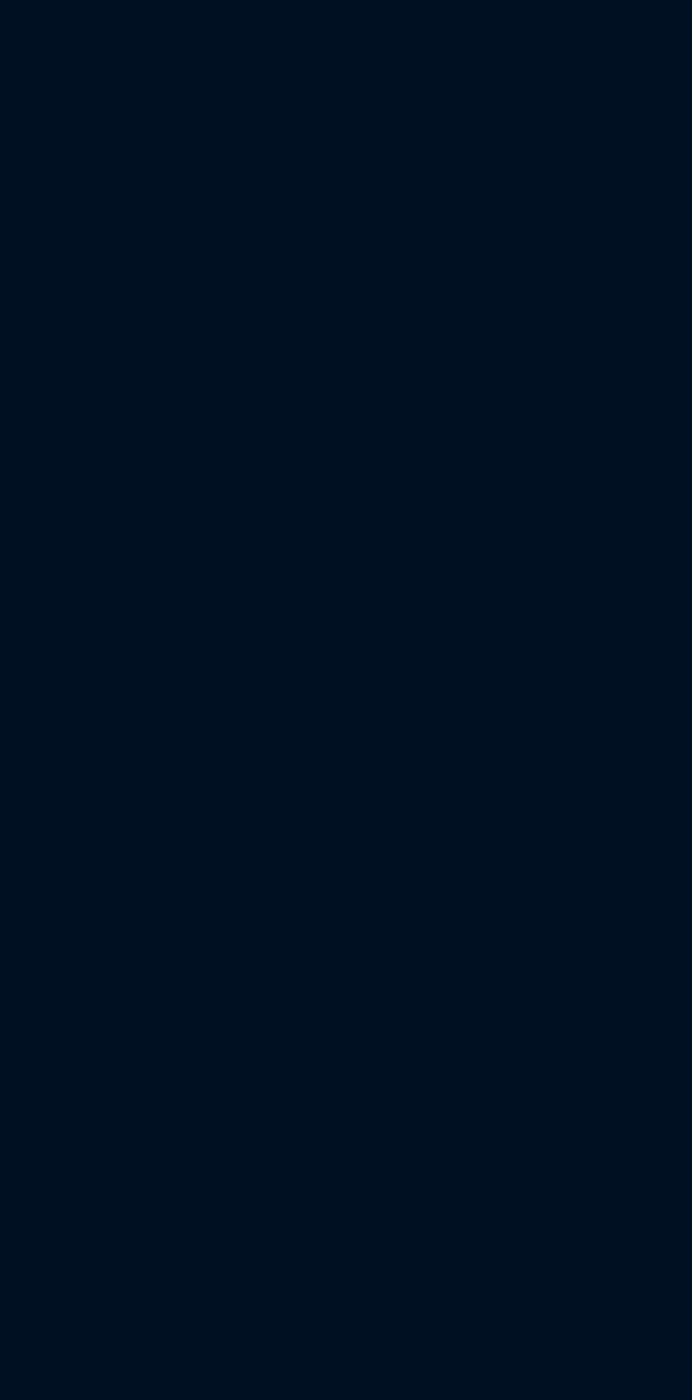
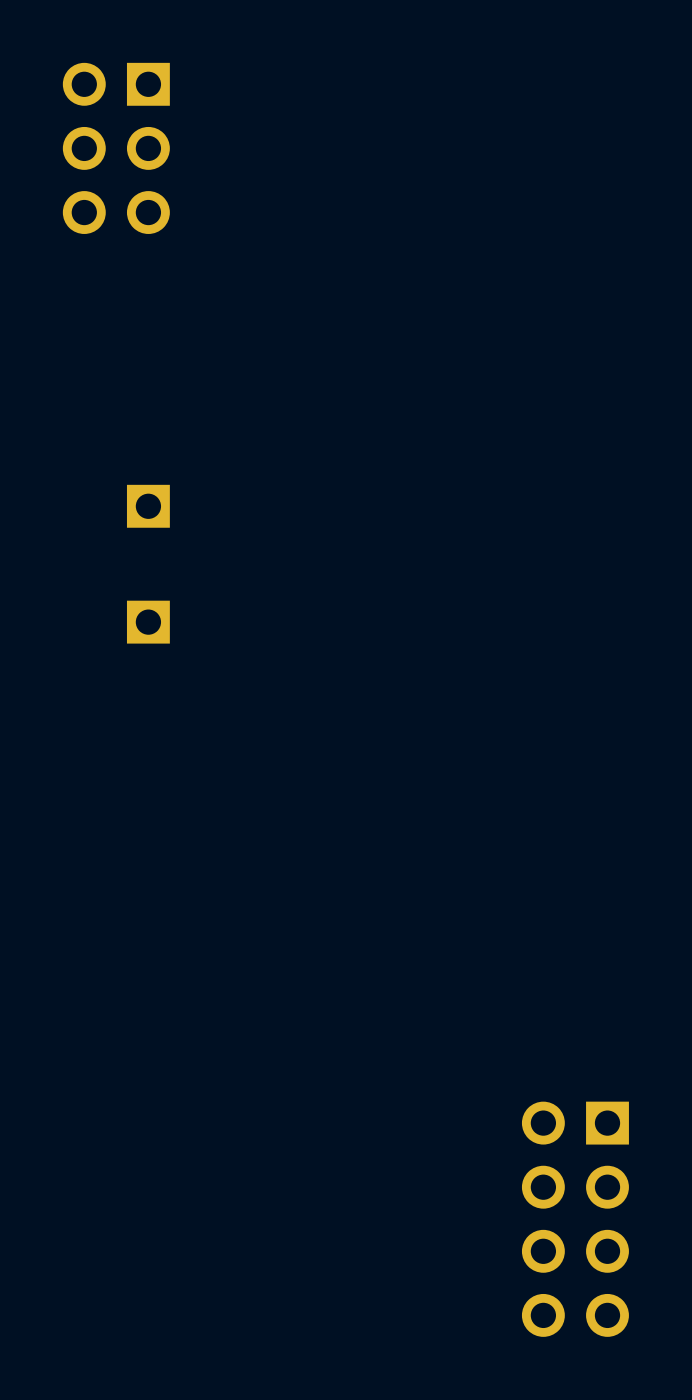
part: none -> (116, 148)
part: none -> (148, 506)
part: none -> (148, 622)
part: none -> (575, 1219)

